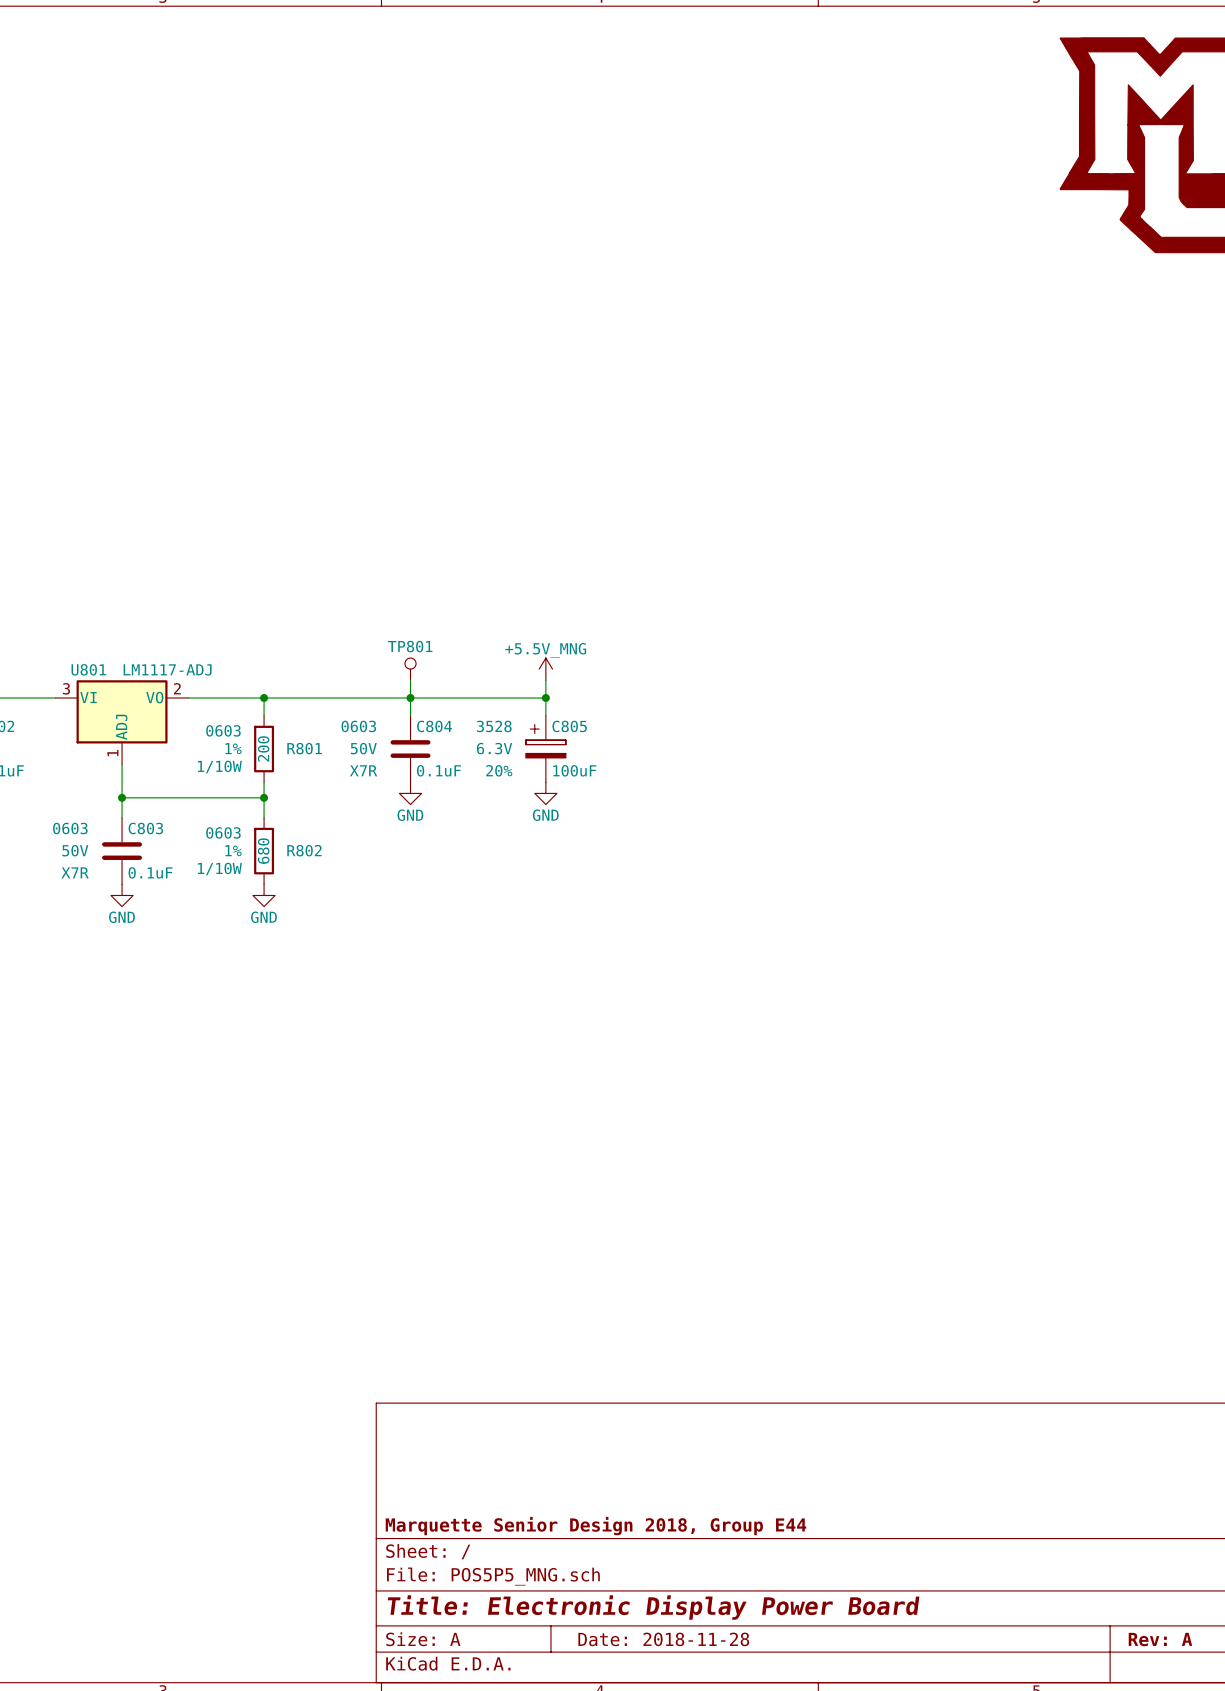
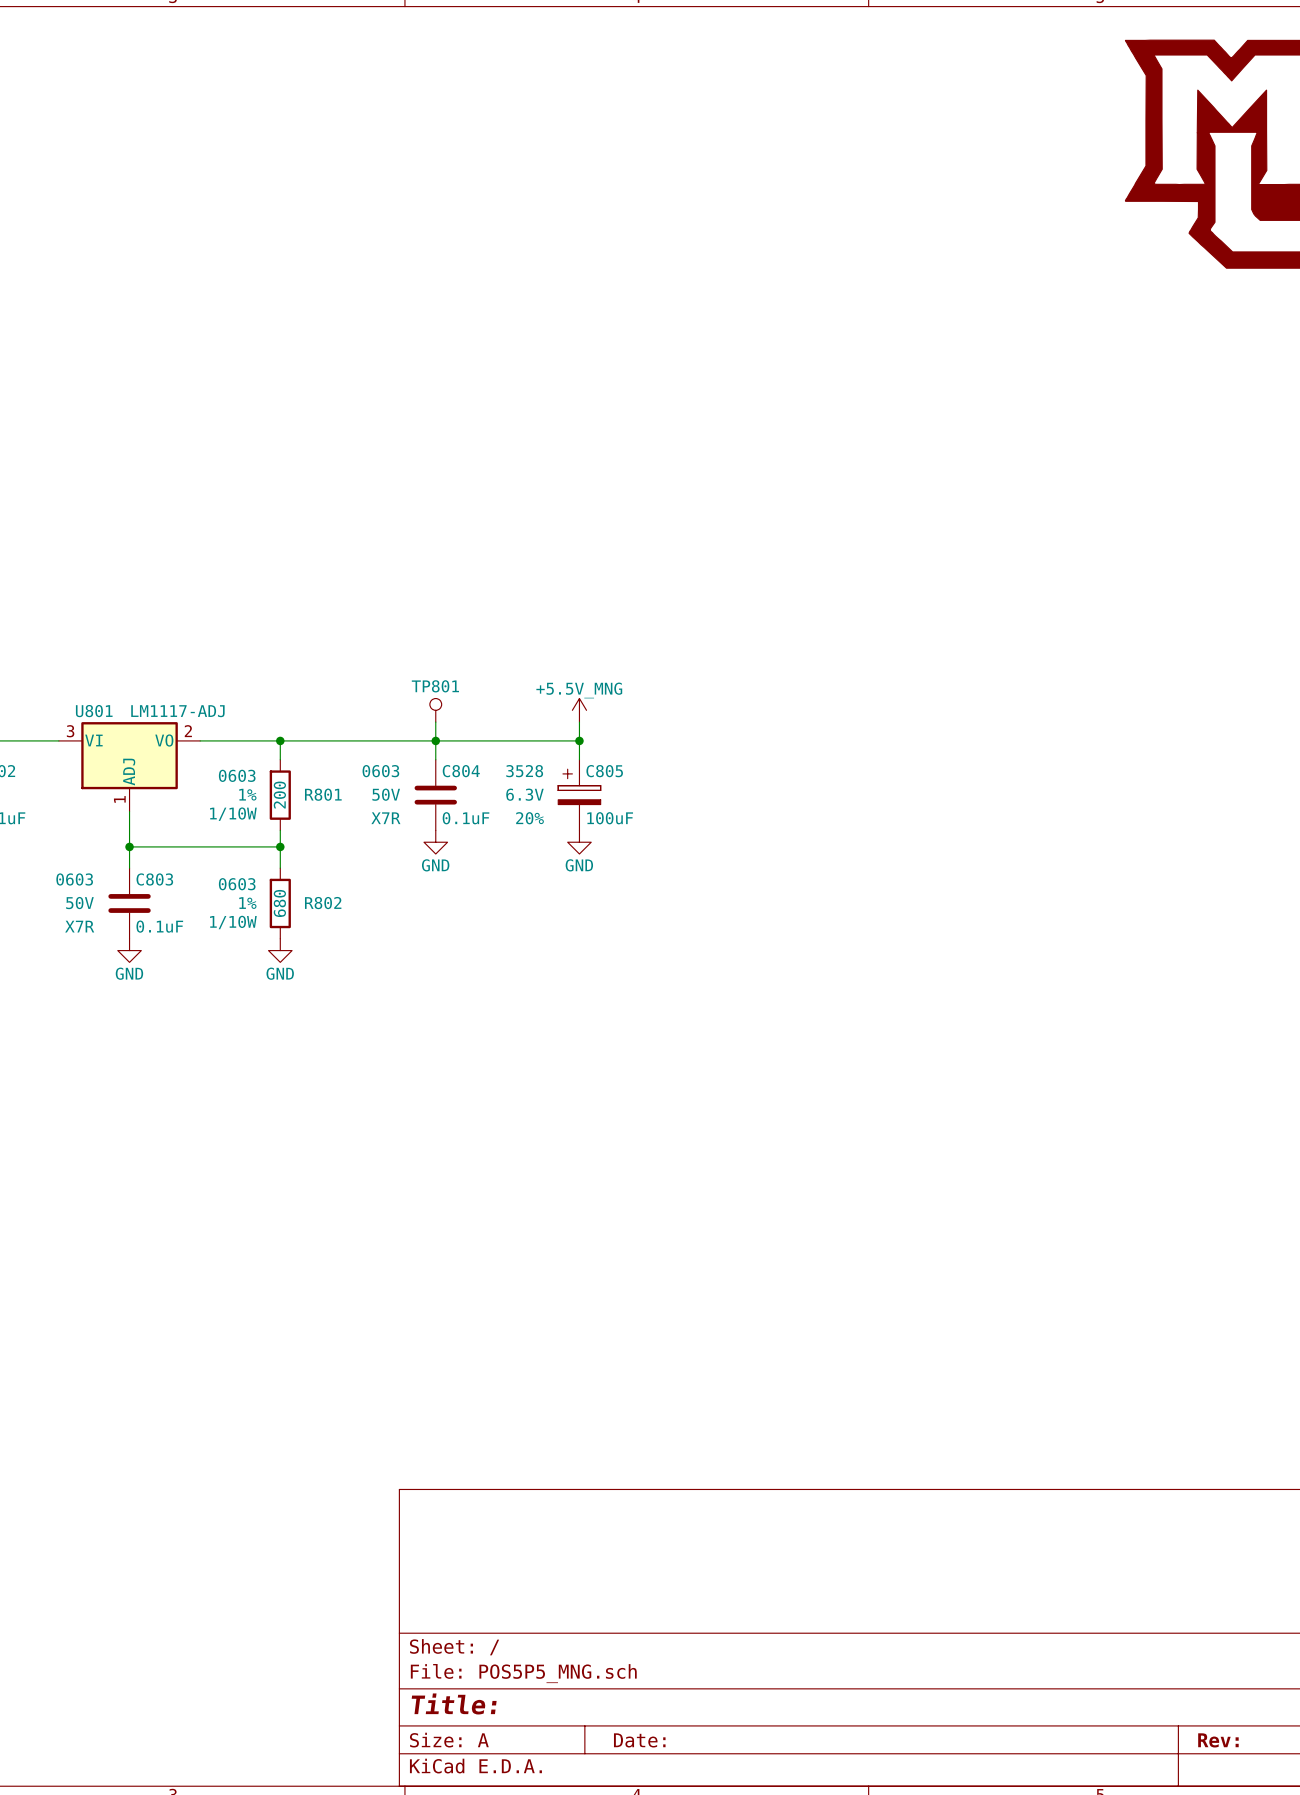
title block: Marquette Senior Design 2018, Group E44 (595, 1526) -> none
title block: Title: Electronic Display Power Board (653, 1607) -> Title: (454, 1703)
title block: Date: 2018-11-28 (663, 1639) -> Date: (639, 1740)
title block: Rev: A (1160, 1639) -> Rev: (1218, 1740)

